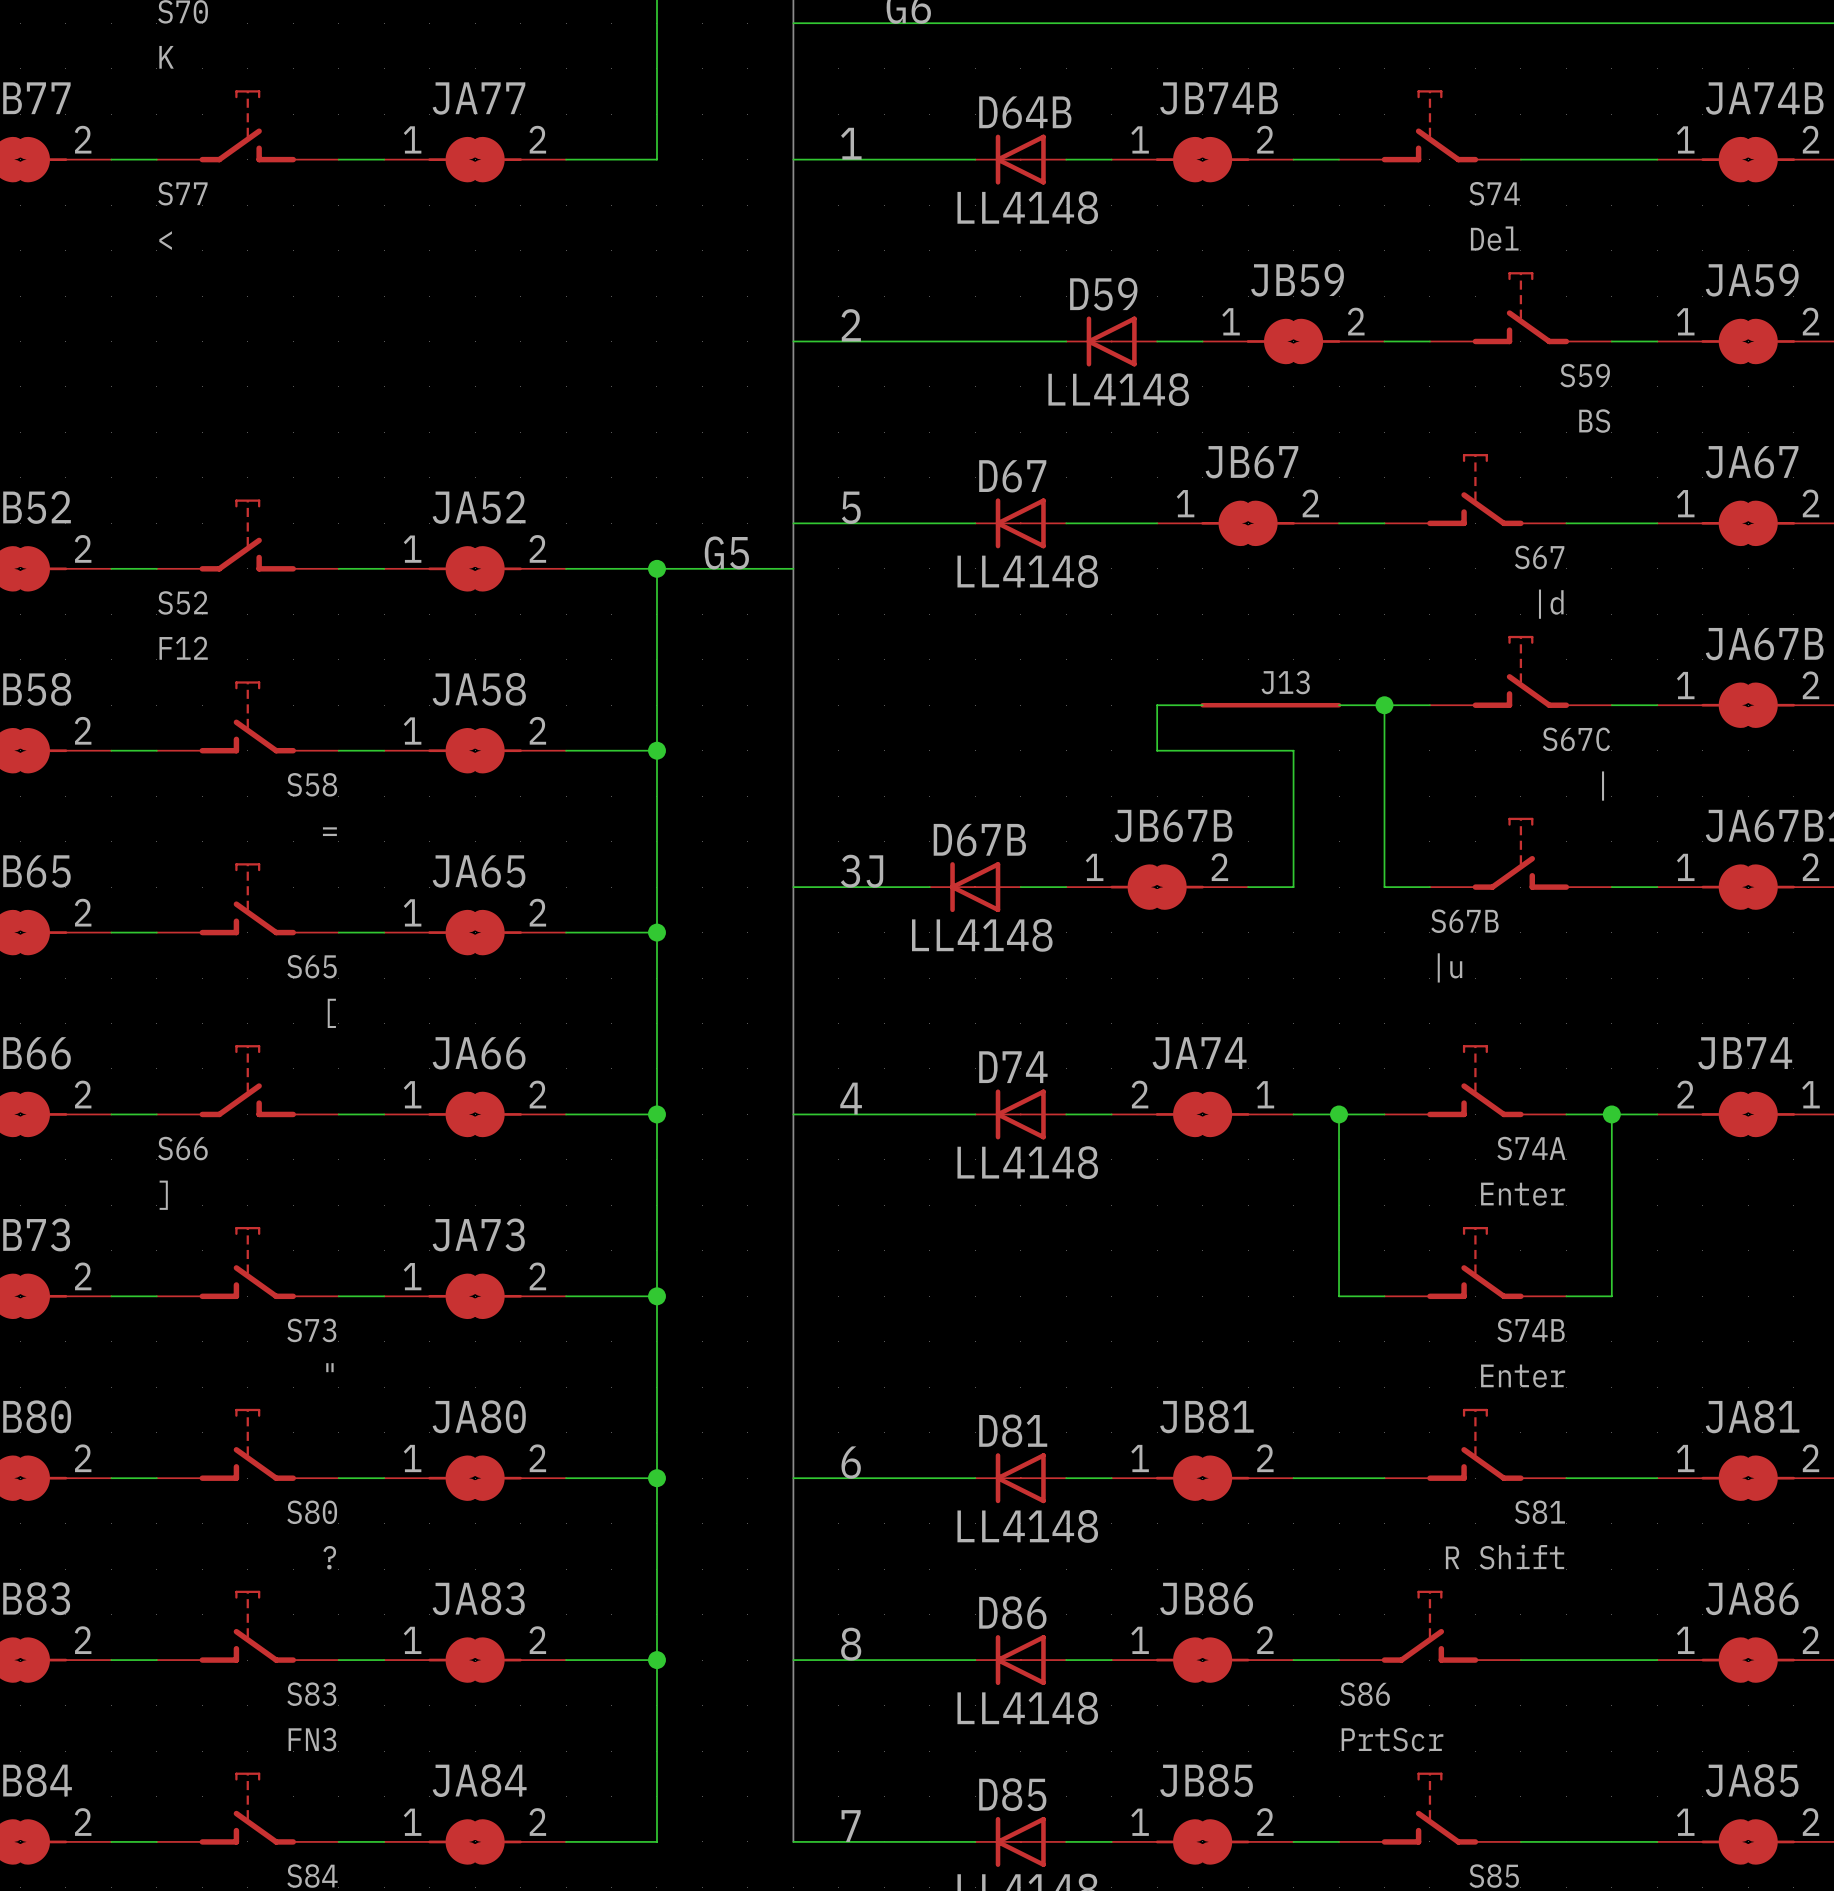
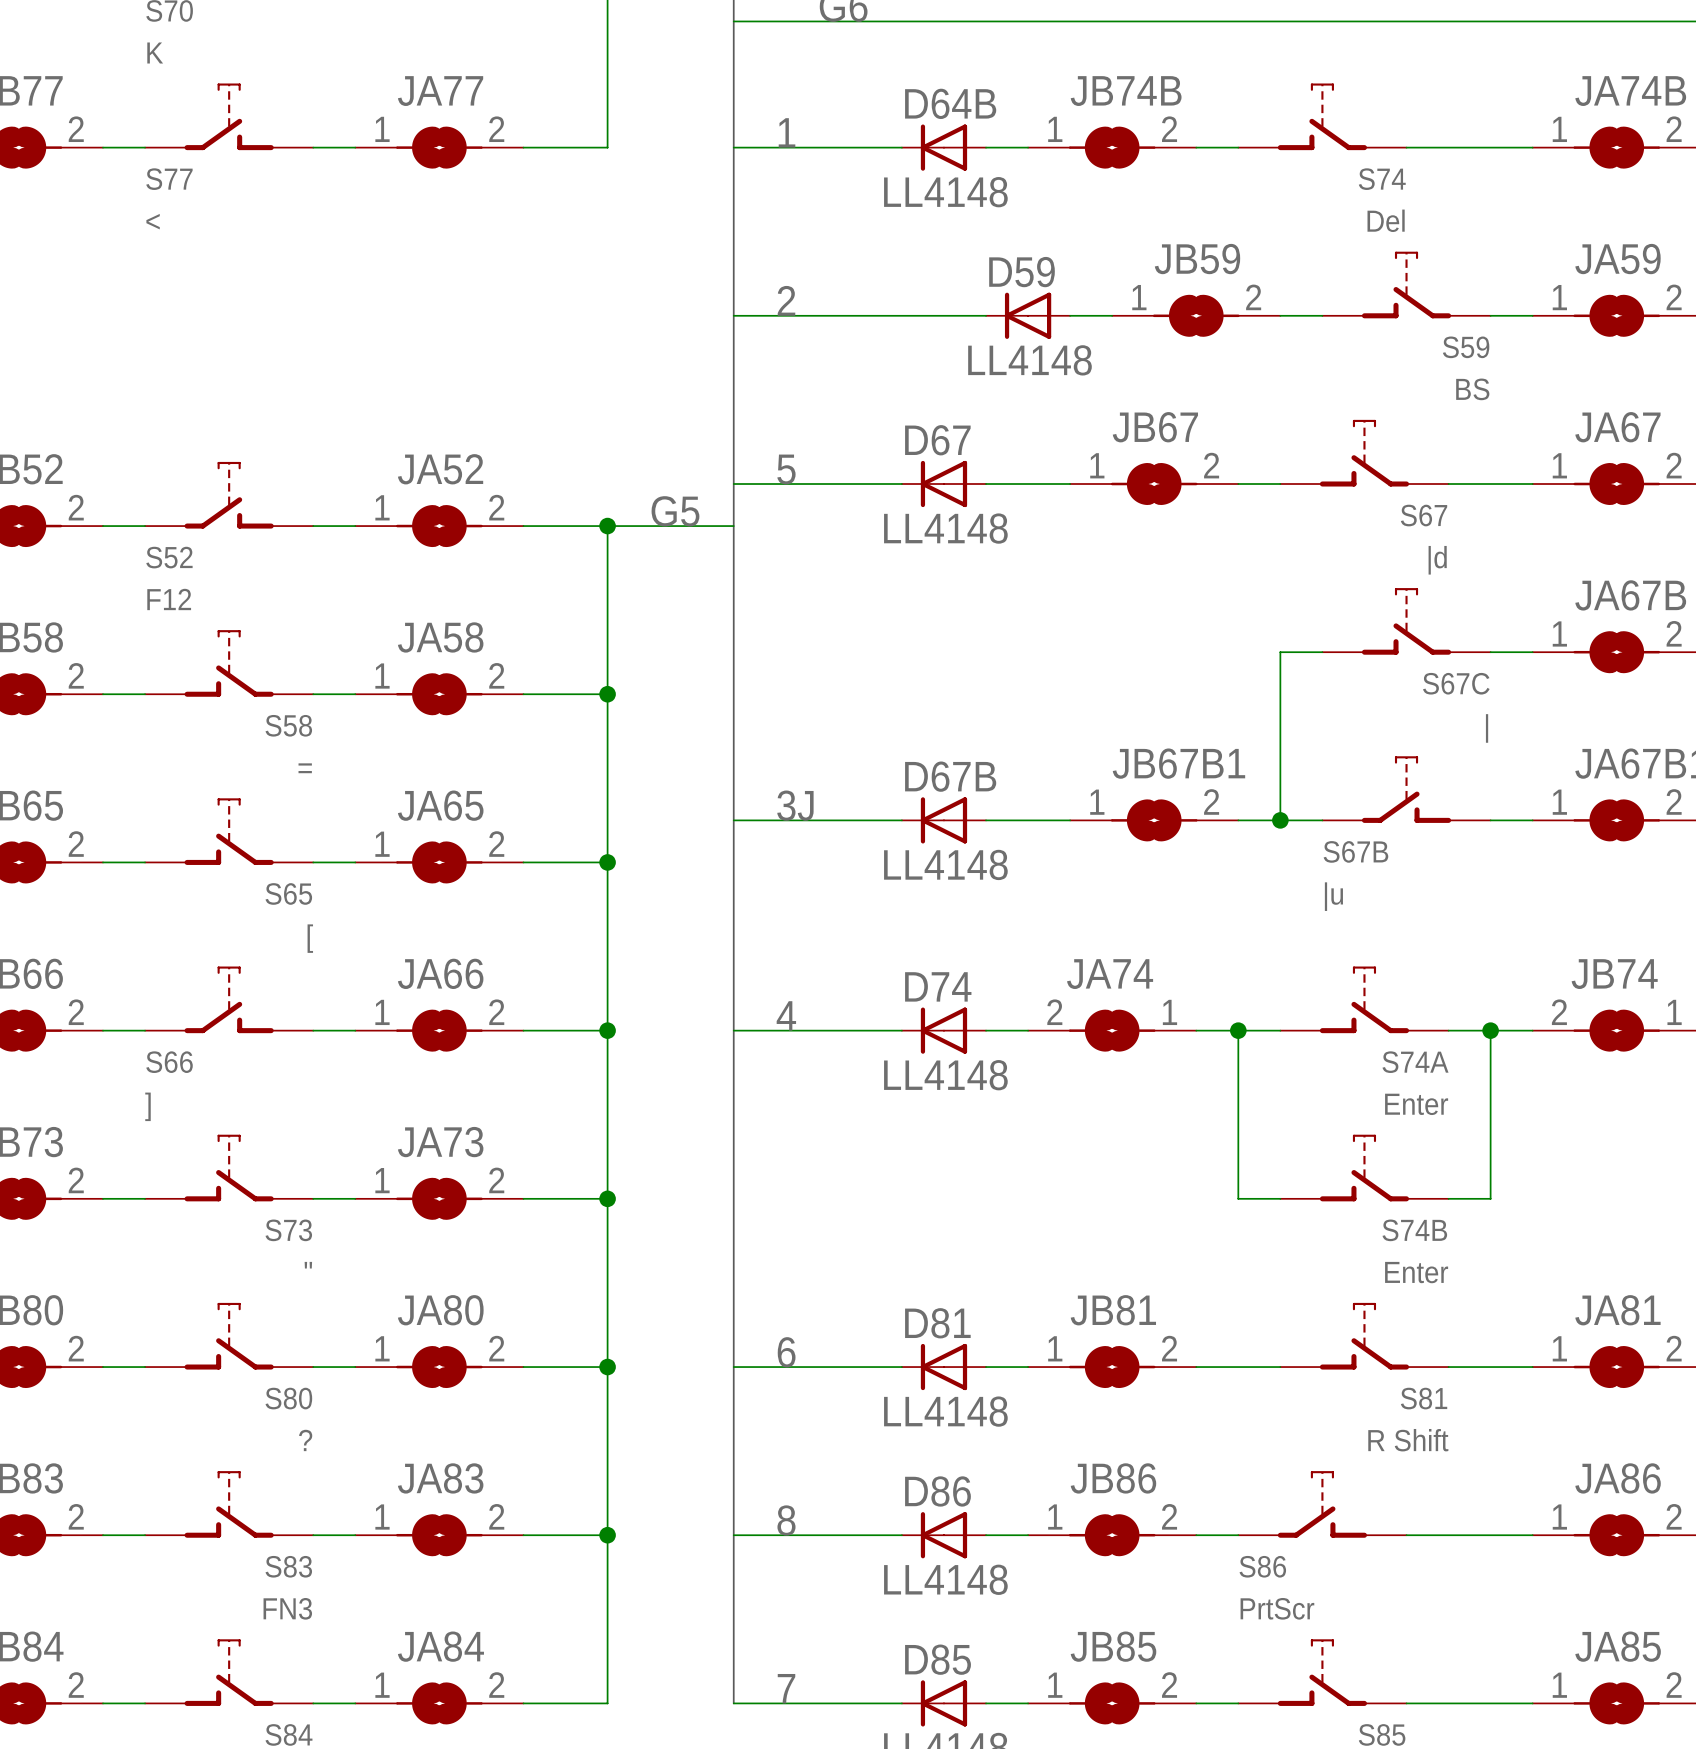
wire: (1202, 705) (1157, 705) (1157, 750) (1293, 750) (1293, 887) (1248, 887) -> none
J13: (1270, 705) -> none
wire: (1339, 705) (1384, 705) -> (1238, 820) (1280, 820)
junction: (1384, 705) -> none
D67B position: (975, 887) -> (943, 820)
JB67B: (1157, 887) -> none
JB67B1: none -> (1154, 820)
junction: none -> (1280, 820)

